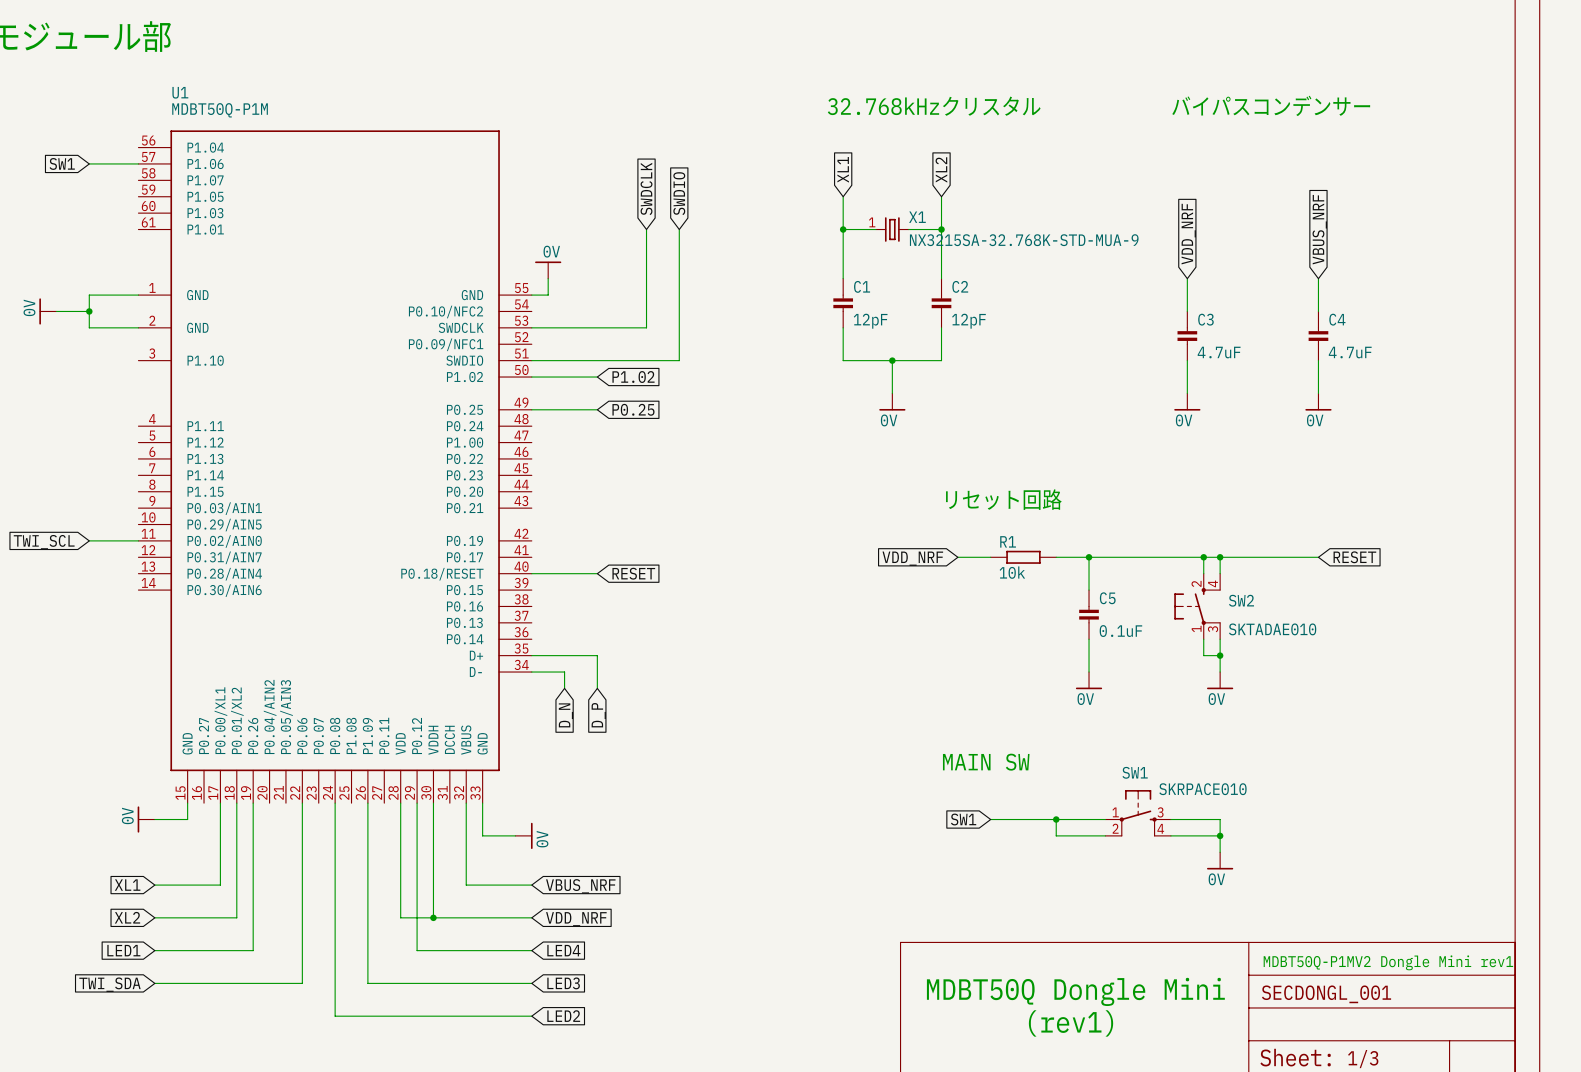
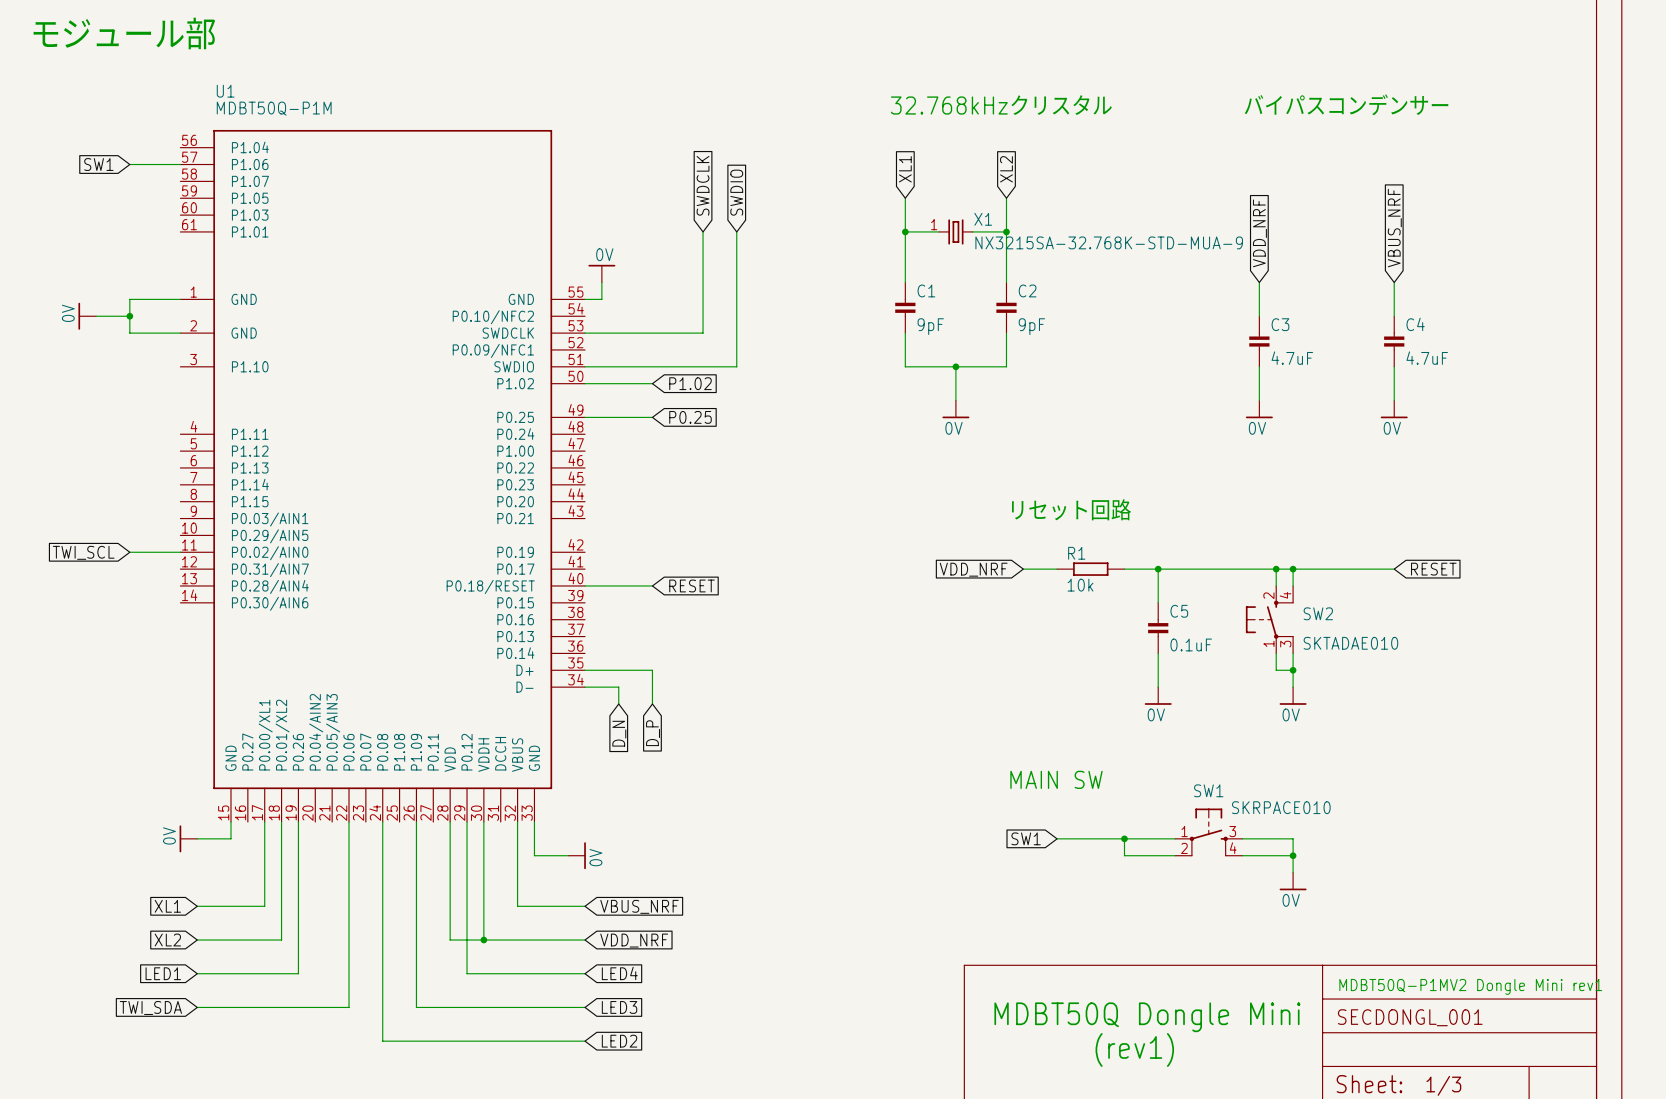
C1 value: 12pF (870, 321) -> 9pF (930, 326)
C2 value: 12pF (968, 321) -> 9pF (1031, 326)

